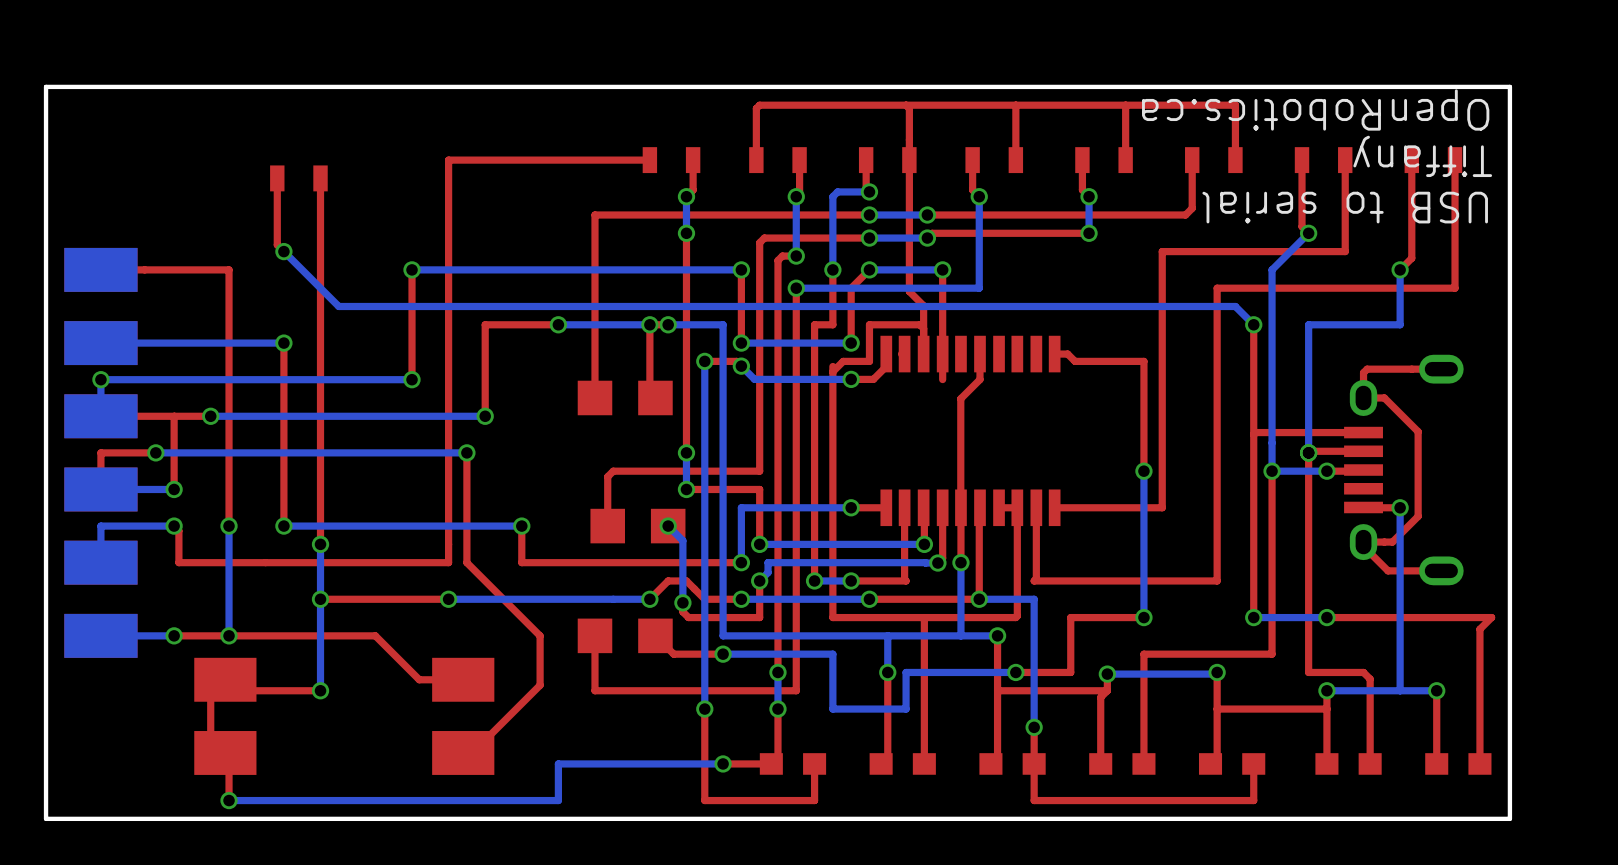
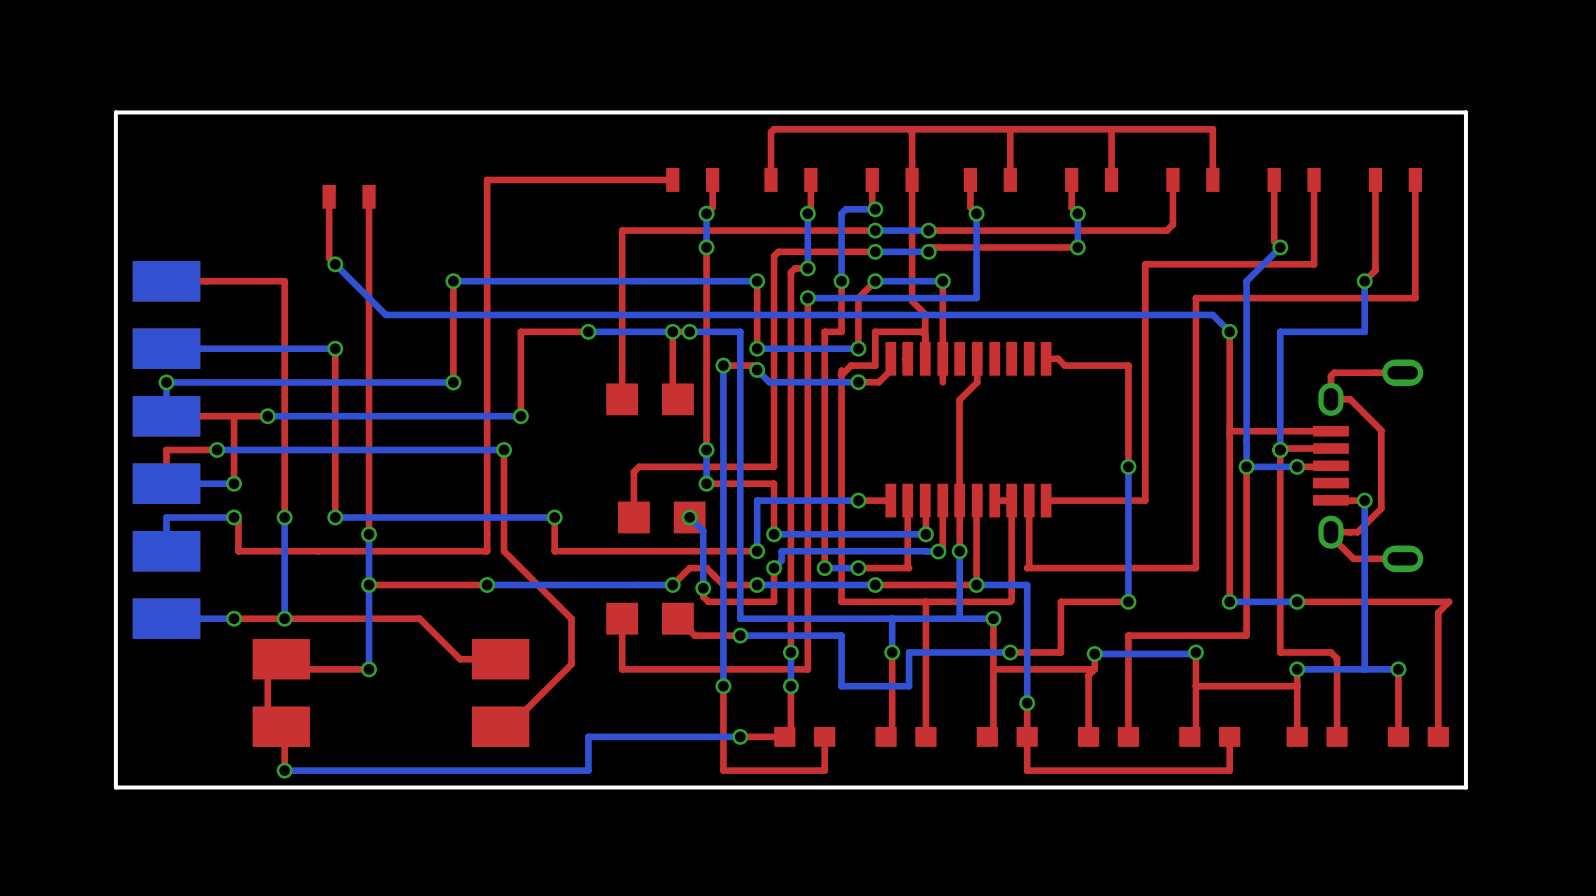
text: OpenRobotics.ca (1315, 109) -> none
text: Tiffany (1422, 156) -> none
text: USB to serial (1345, 207) -> none

